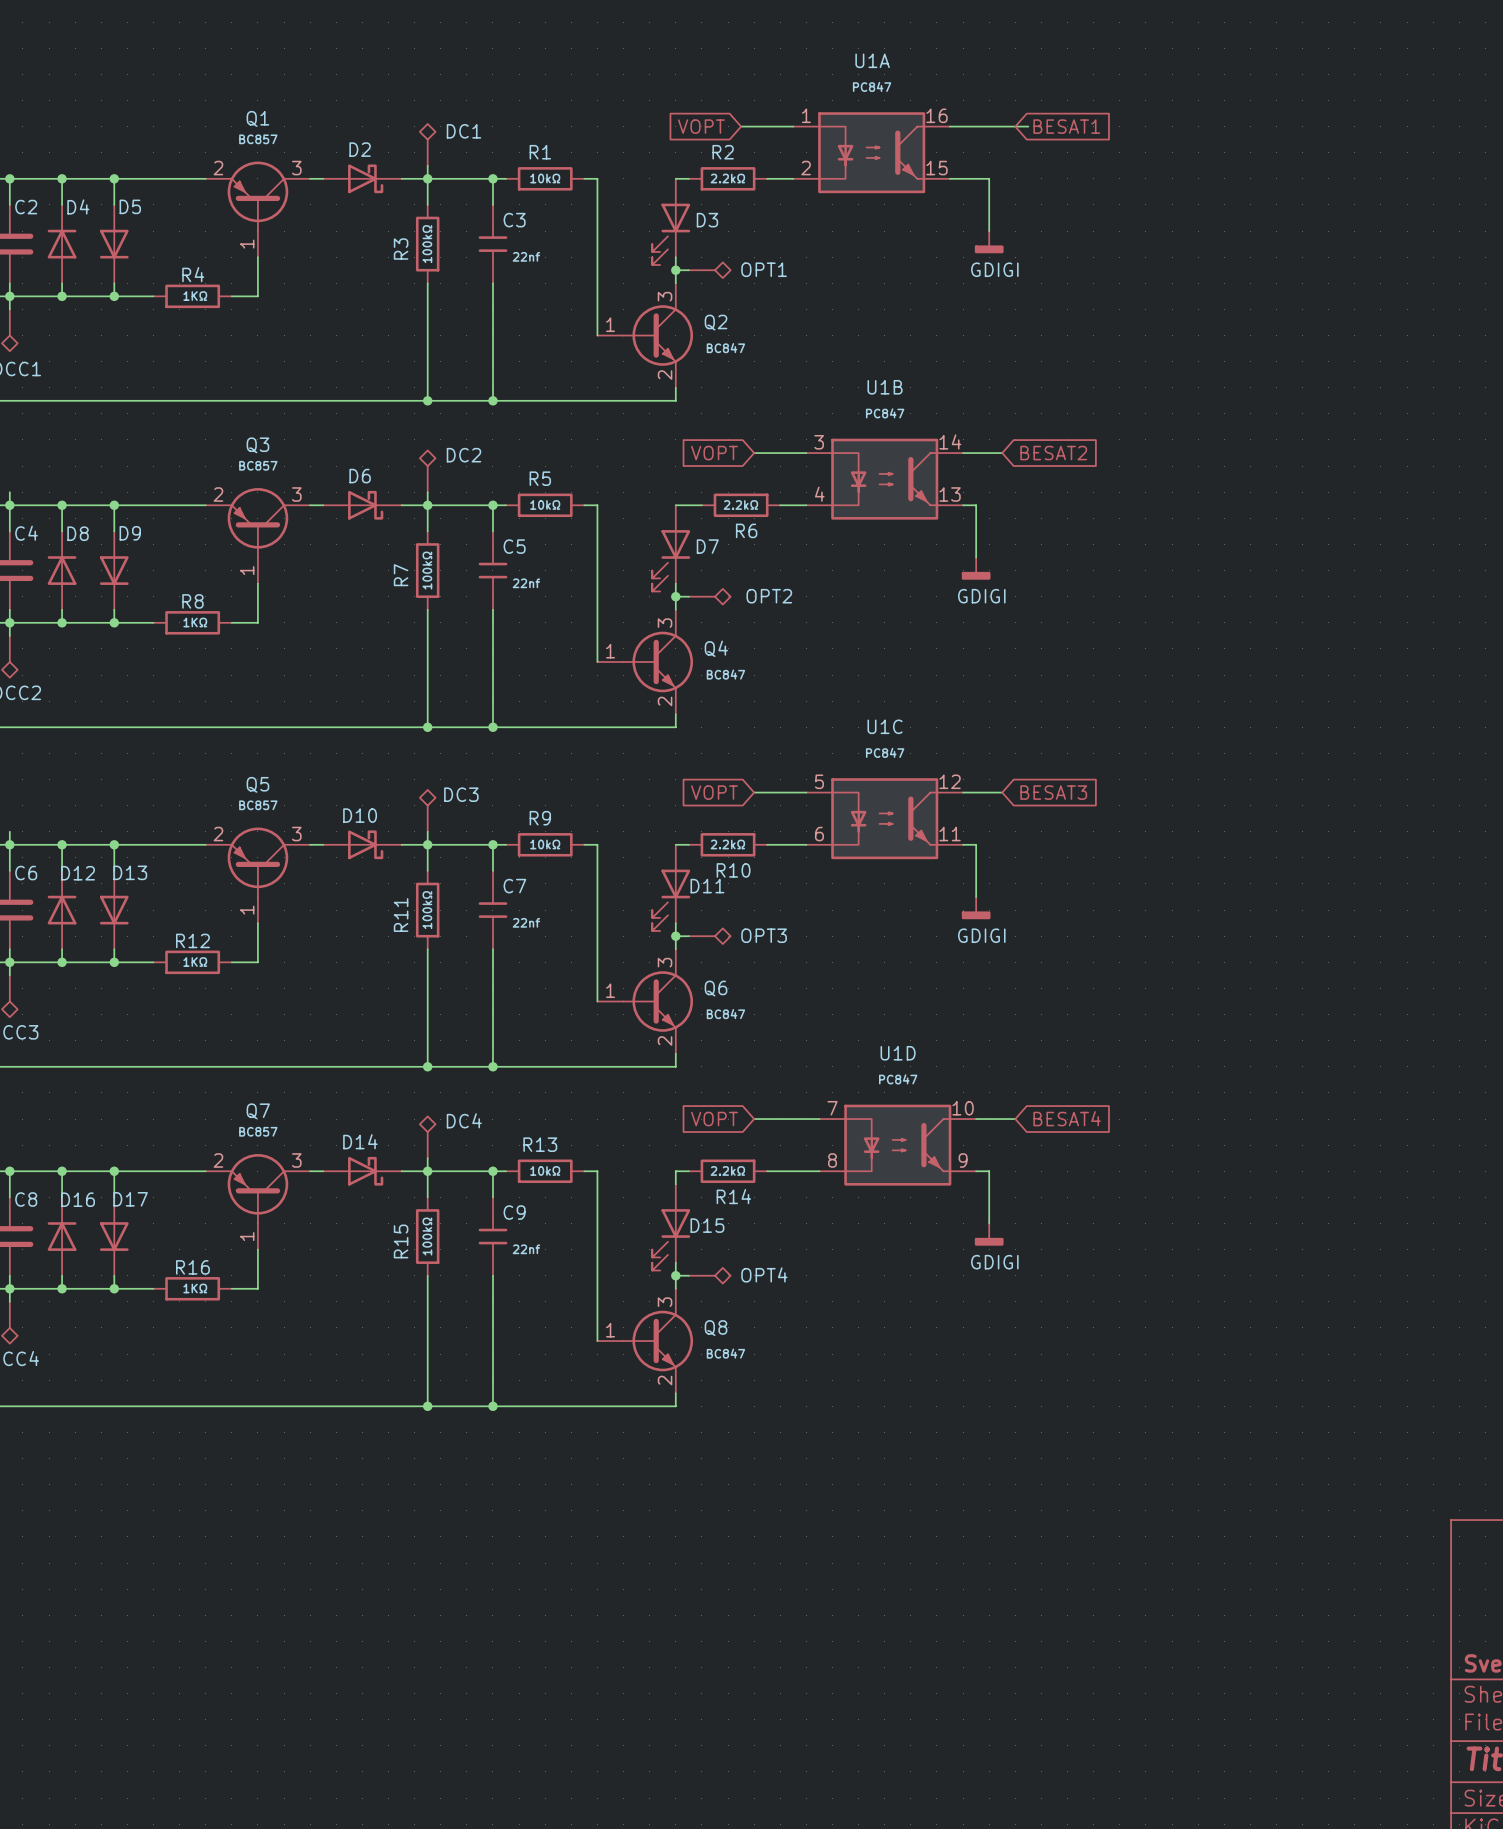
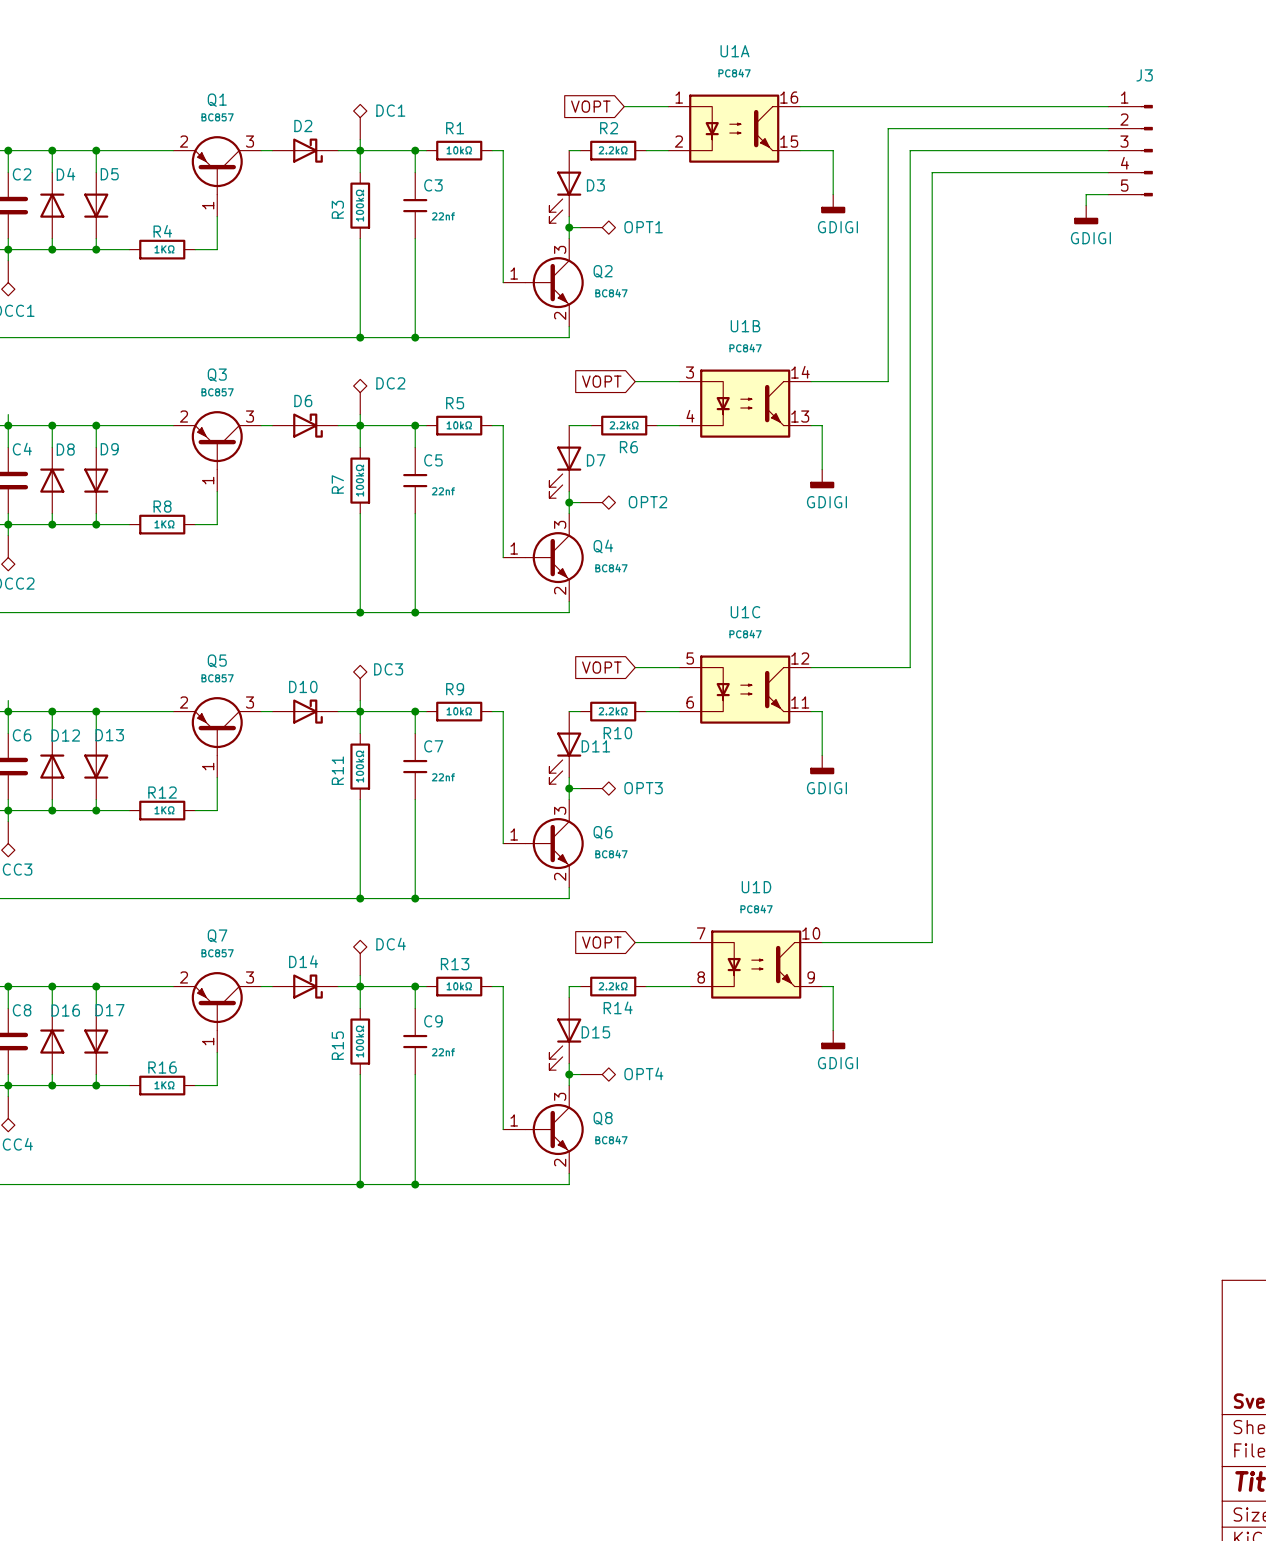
wire: none -> (866, 106) (1108, 106)
global label: BESAT1 (1066, 126) -> none
wire: none -> (1108, 128) (888, 128) (888, 381) (844, 381)
wire: none -> (1108, 150) (910, 150) (910, 667) (844, 667)
J3: none -> (1130, 150)
wire: none -> (1108, 172) (932, 172) (932, 942) (855, 942)
wire: none -> (1108, 194) (1086, 194) (1086, 205)
power symbol: none -> GDIGI (1086, 214)
global label: BESAT2 (1053, 453) -> none
global label: BESAT3 (1053, 792) -> none
global label: BESAT4 (1067, 1118) -> none

